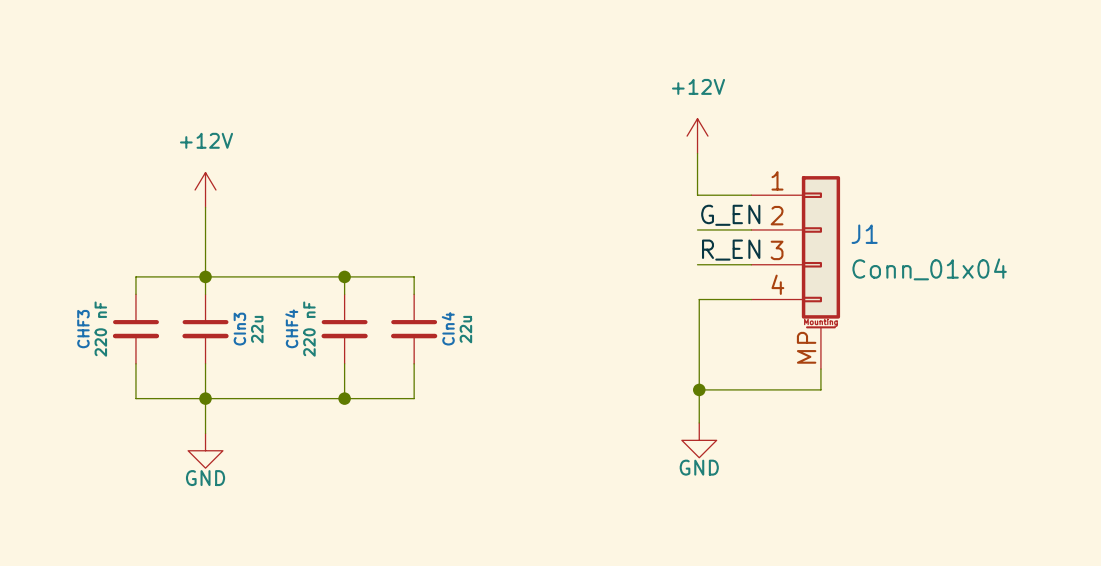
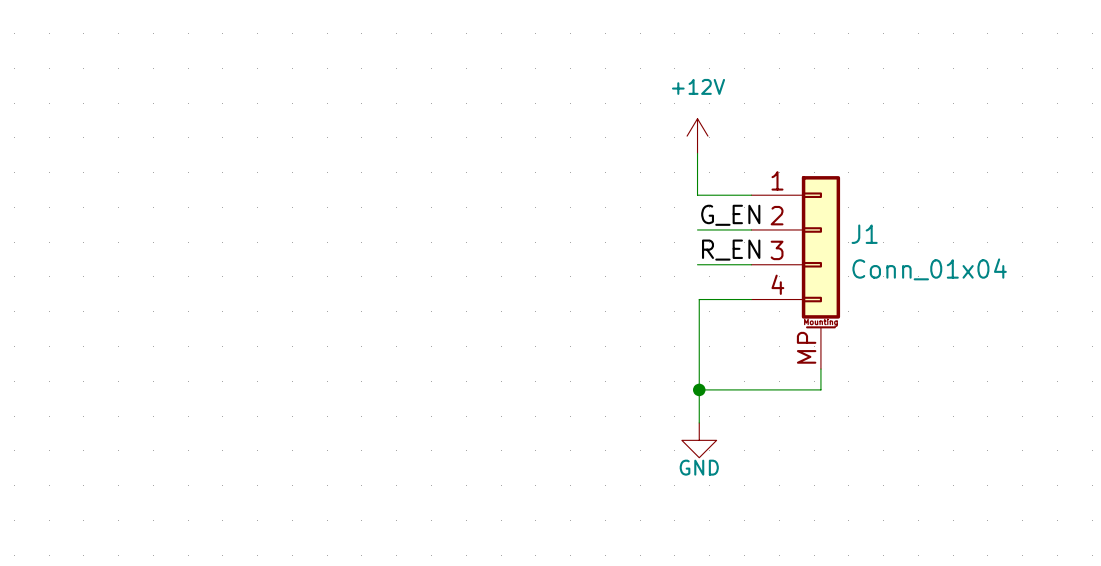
power symbol: +12V (205, 190) -> none
wire: (205, 207) (205, 294) -> none
junction: (205, 276) -> none
wire: (344, 276) (344, 294) -> none
junction: (344, 276) -> none
wire: (135, 294) (135, 276) (414, 276) (414, 294) -> none
CHF3: 220 nF (135, 329) -> none
CIn3: 22u (205, 329) -> none
CHF4: 220 nF (344, 329) -> none
CIn4: 22u (414, 329) -> none
wire: (135, 363) (135, 398) (414, 398) (414, 363) -> none
wire: (205, 363) (205, 433) -> none
wire: (344, 363) (344, 398) -> none
junction: (205, 398) -> none
junction: (344, 398) -> none
power symbol: GND (205, 450) -> none

